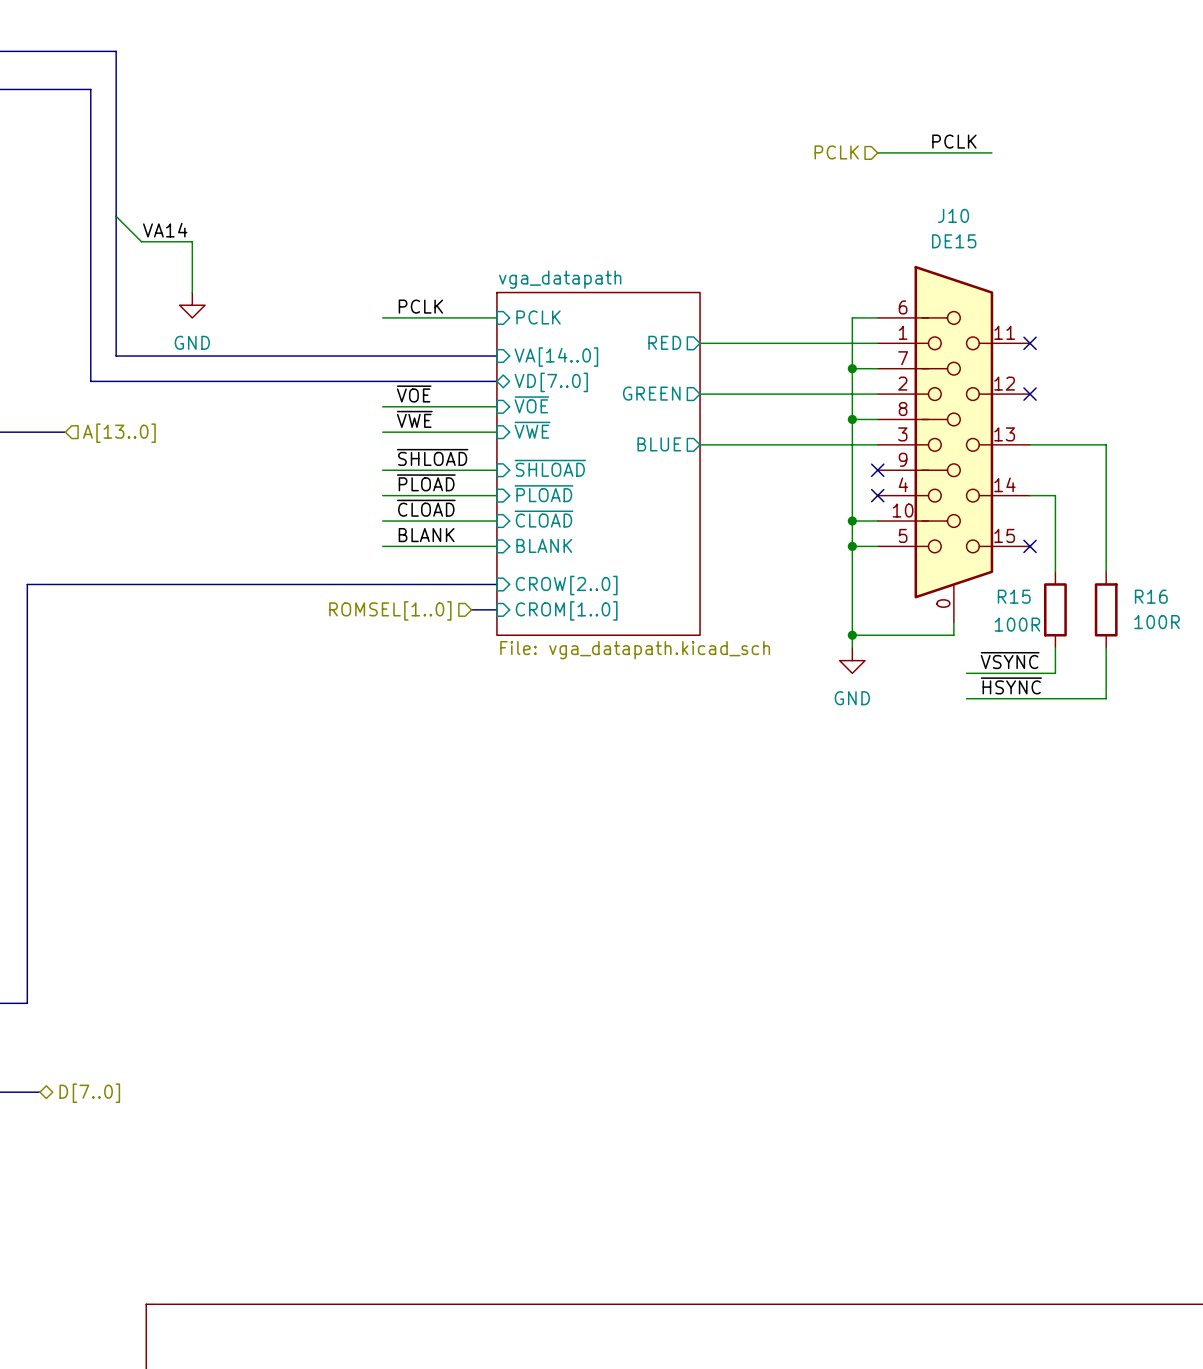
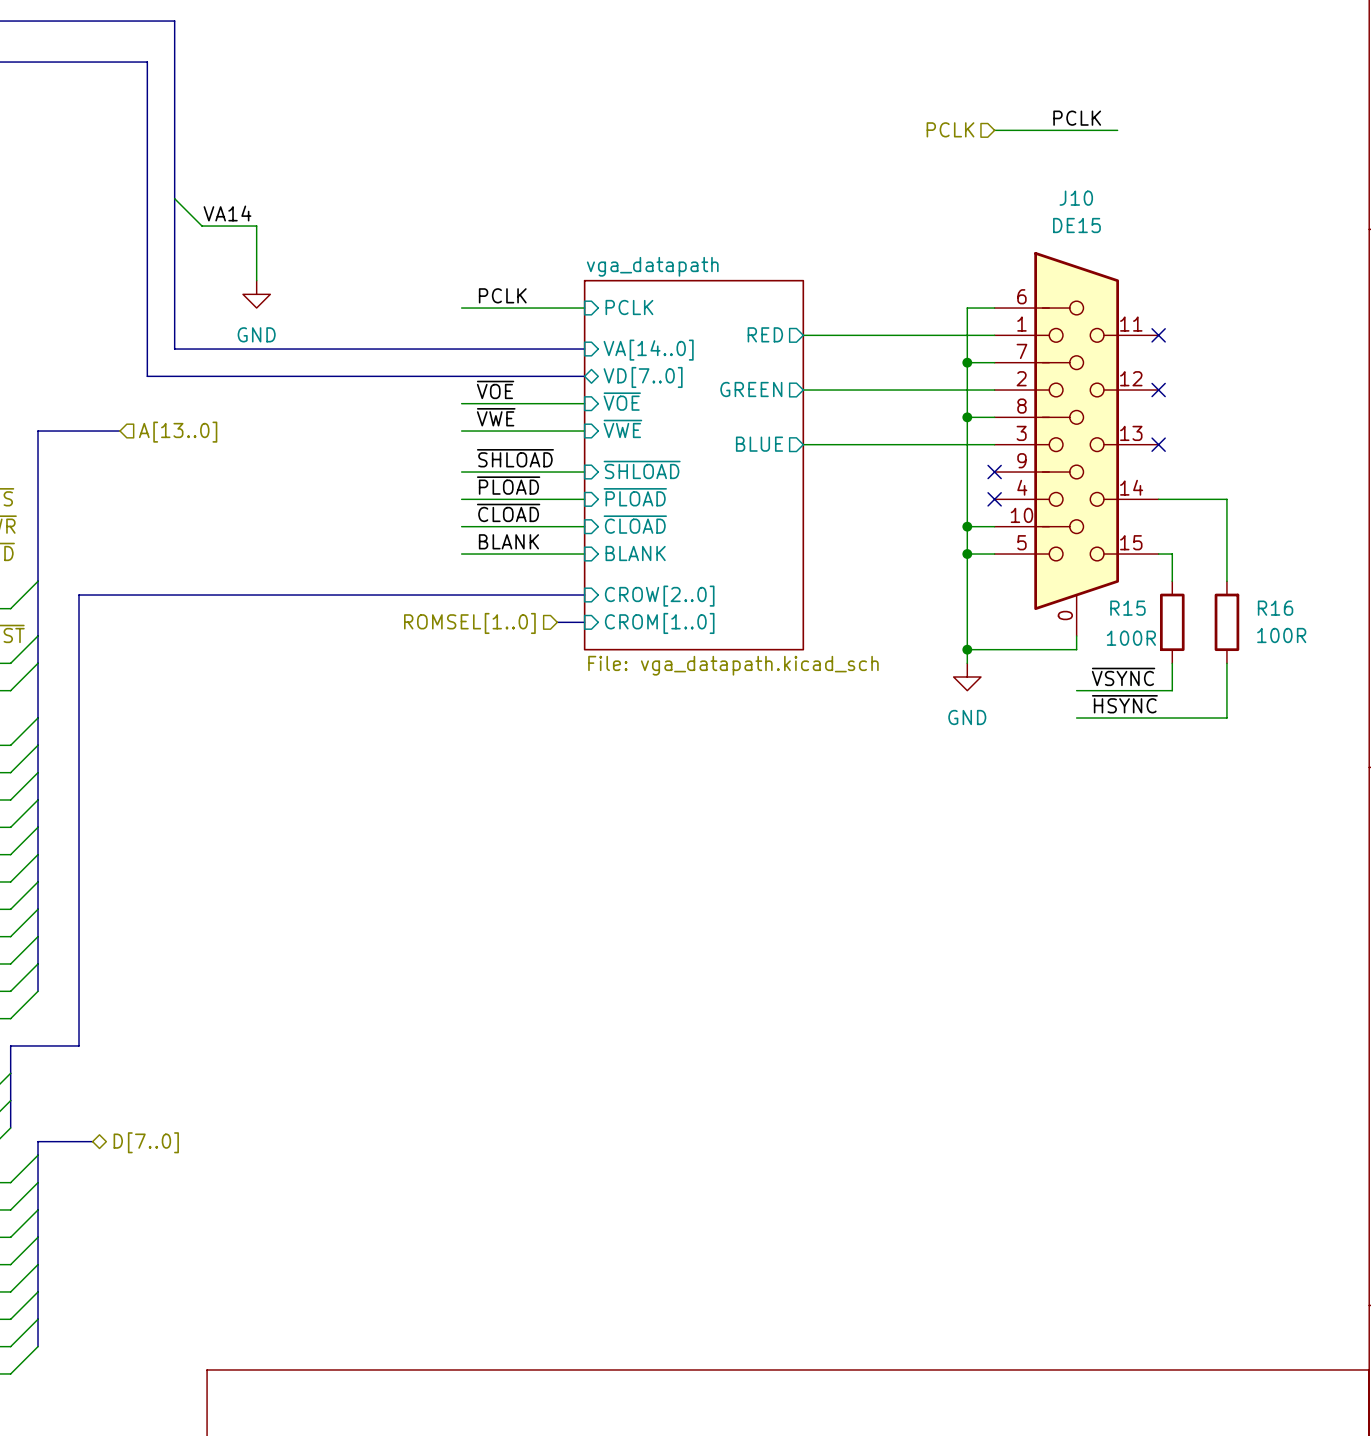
wire: (1030, 444) (1106, 444) (1106, 571) -> none
no-connect mark: none -> (1158, 444)
wire: (1055, 495) (1055, 571) -> (1185, 499) (1226, 499) (1226, 581)
wire: none -> (1158, 554) (1172, 554) (1172, 581)
no-connect mark: (1030, 546) -> none
R15 position: (1055, 609) -> (1172, 622)
R16 position: (1106, 609) -> (1226, 622)
wire: (1055, 647) (1055, 673) (1042, 673) -> (1172, 663) (1172, 690)
wire: (1106, 647) (1106, 698) (1093, 698) -> (1226, 663) (1226, 718)
label position: ~{VSYNC} (1010, 660) -> ~{VSYNC} (1123, 676)
wire: none -> (1076, 690) (1090, 690)
label position: ~{HSYNC} (1011, 685) -> ~{HSYNC} (1124, 704)
wire: none -> (1076, 718) (1090, 718)

